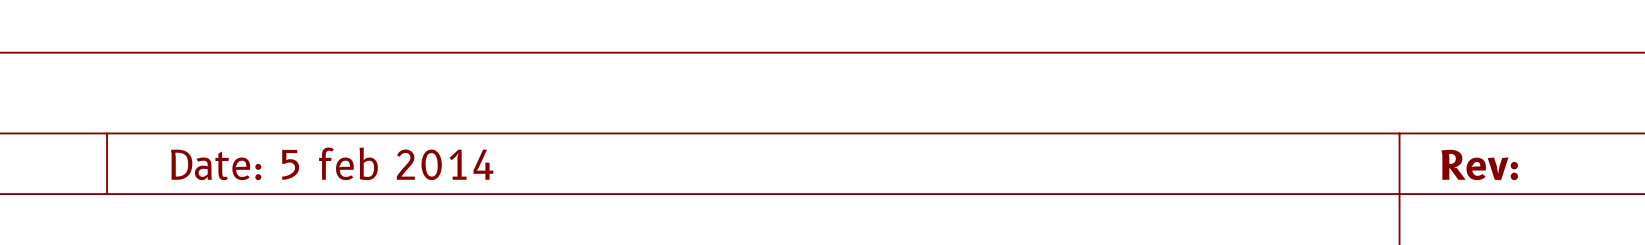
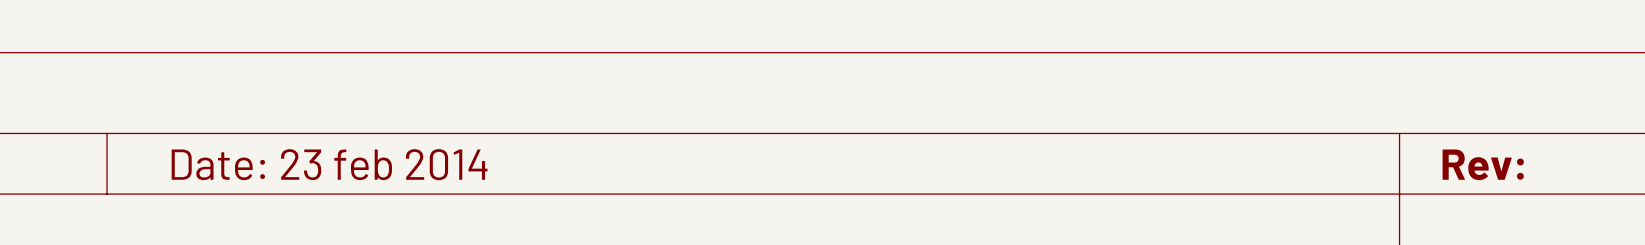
title block: Date: 5 feb 2014 (332, 163) -> Date: 23 feb 2014 (329, 164)

